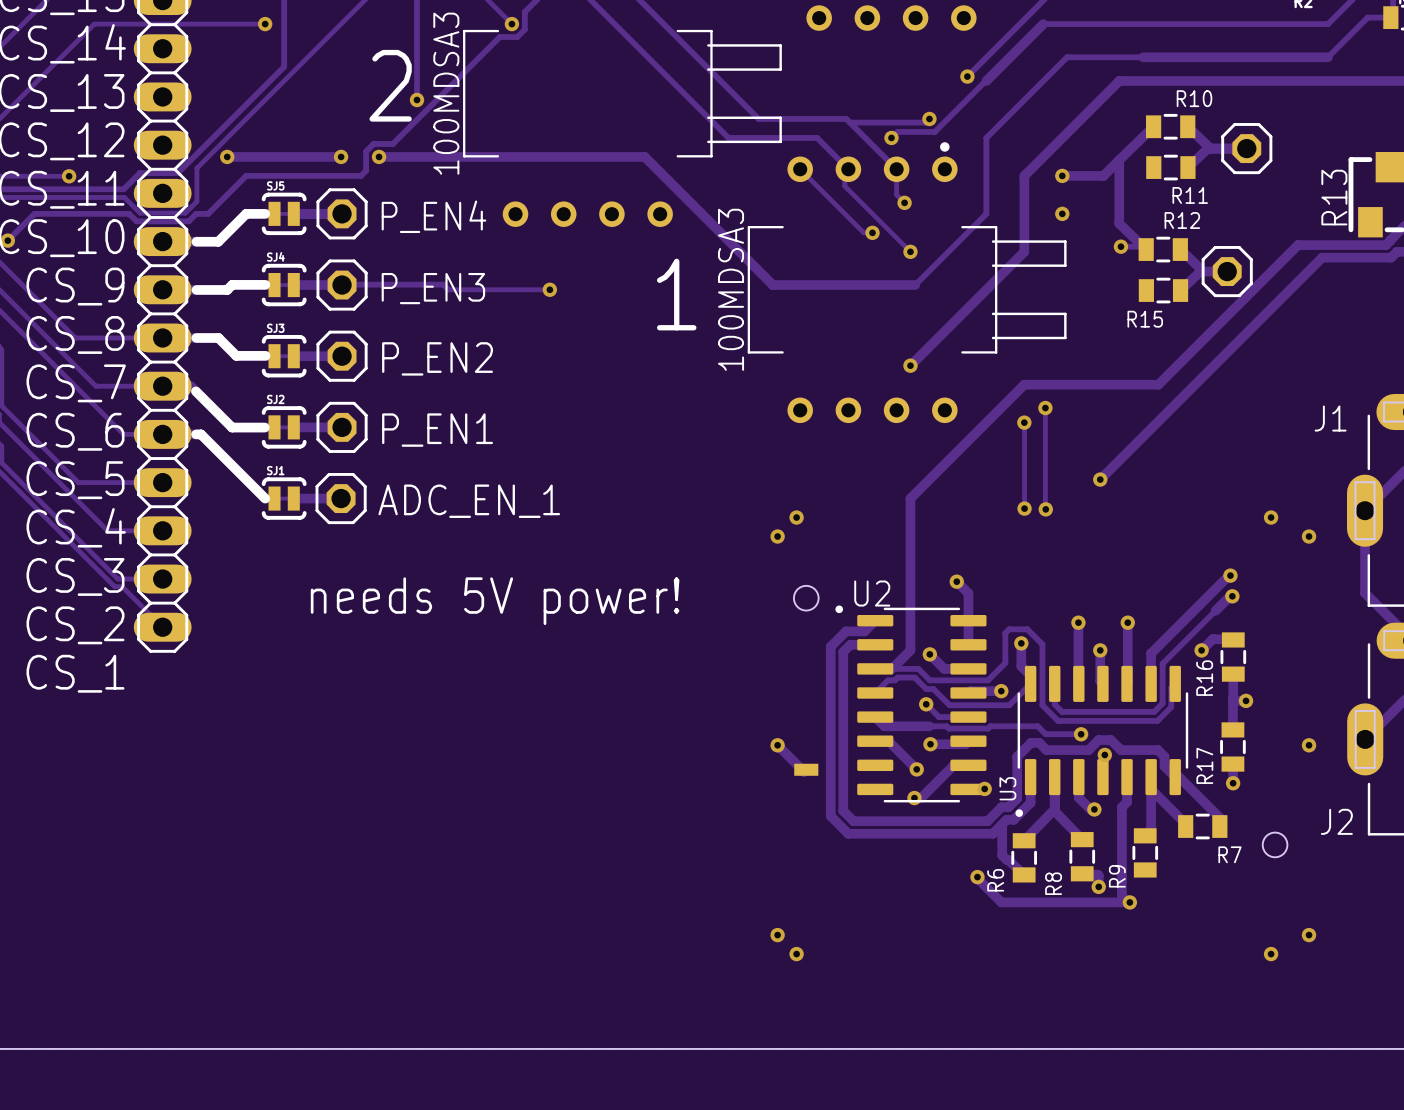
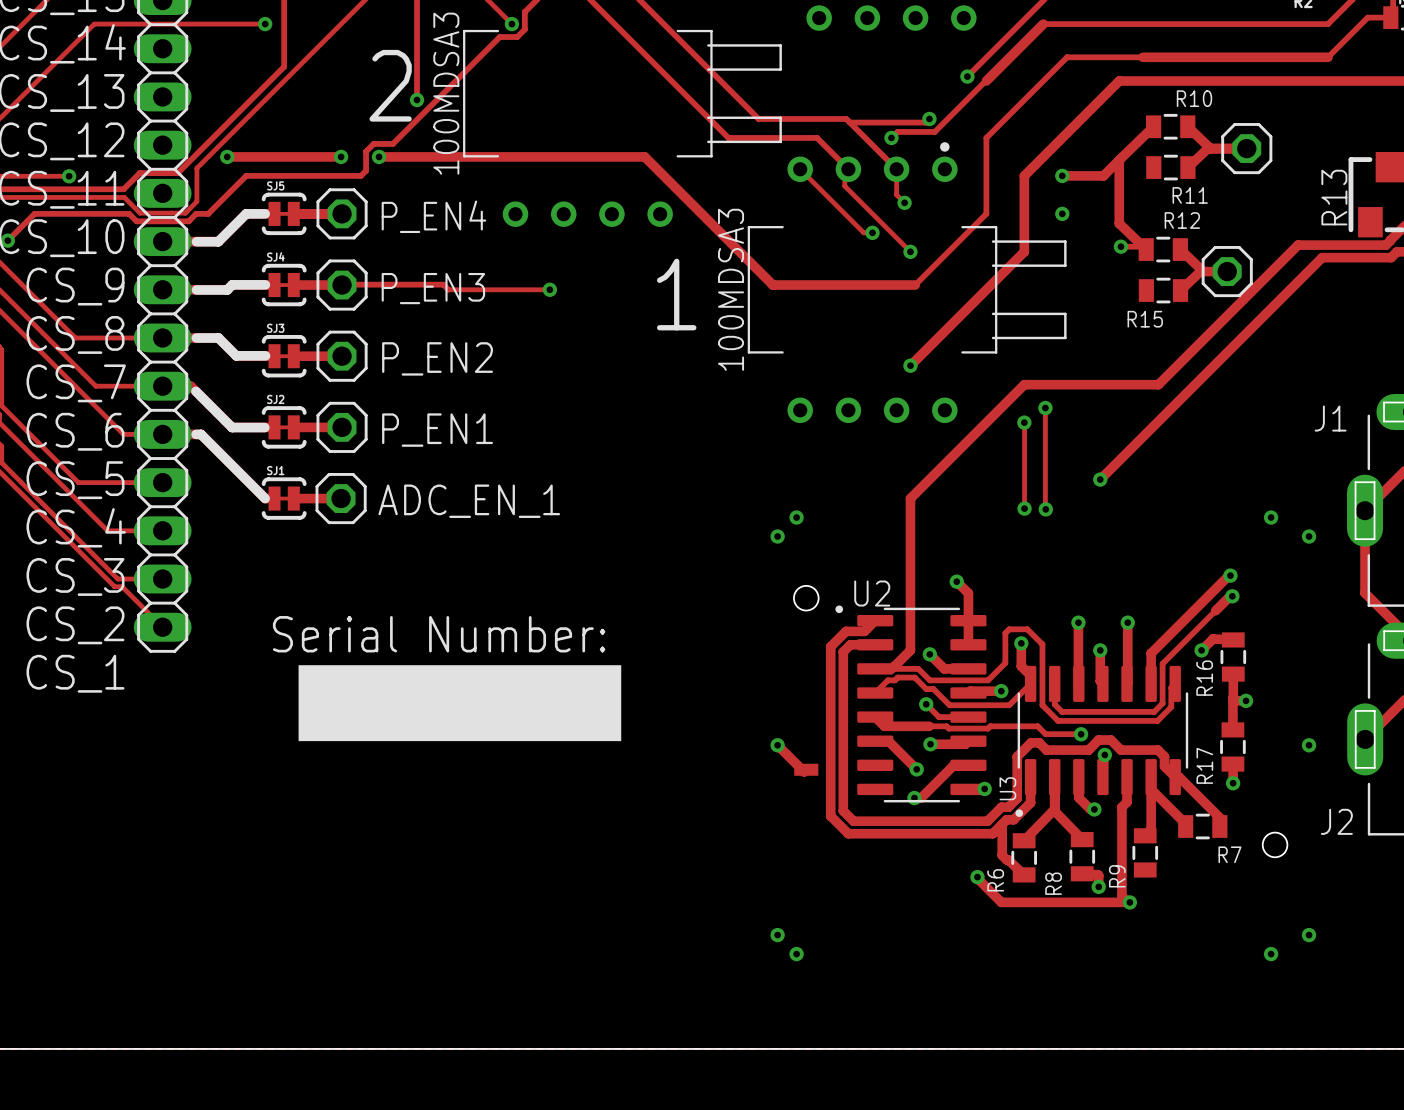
text: needs 5V power! (495, 601) -> none
text: none -> Serial Number: (439, 634)
drawing: none -> [298, 665, 622, 742]

